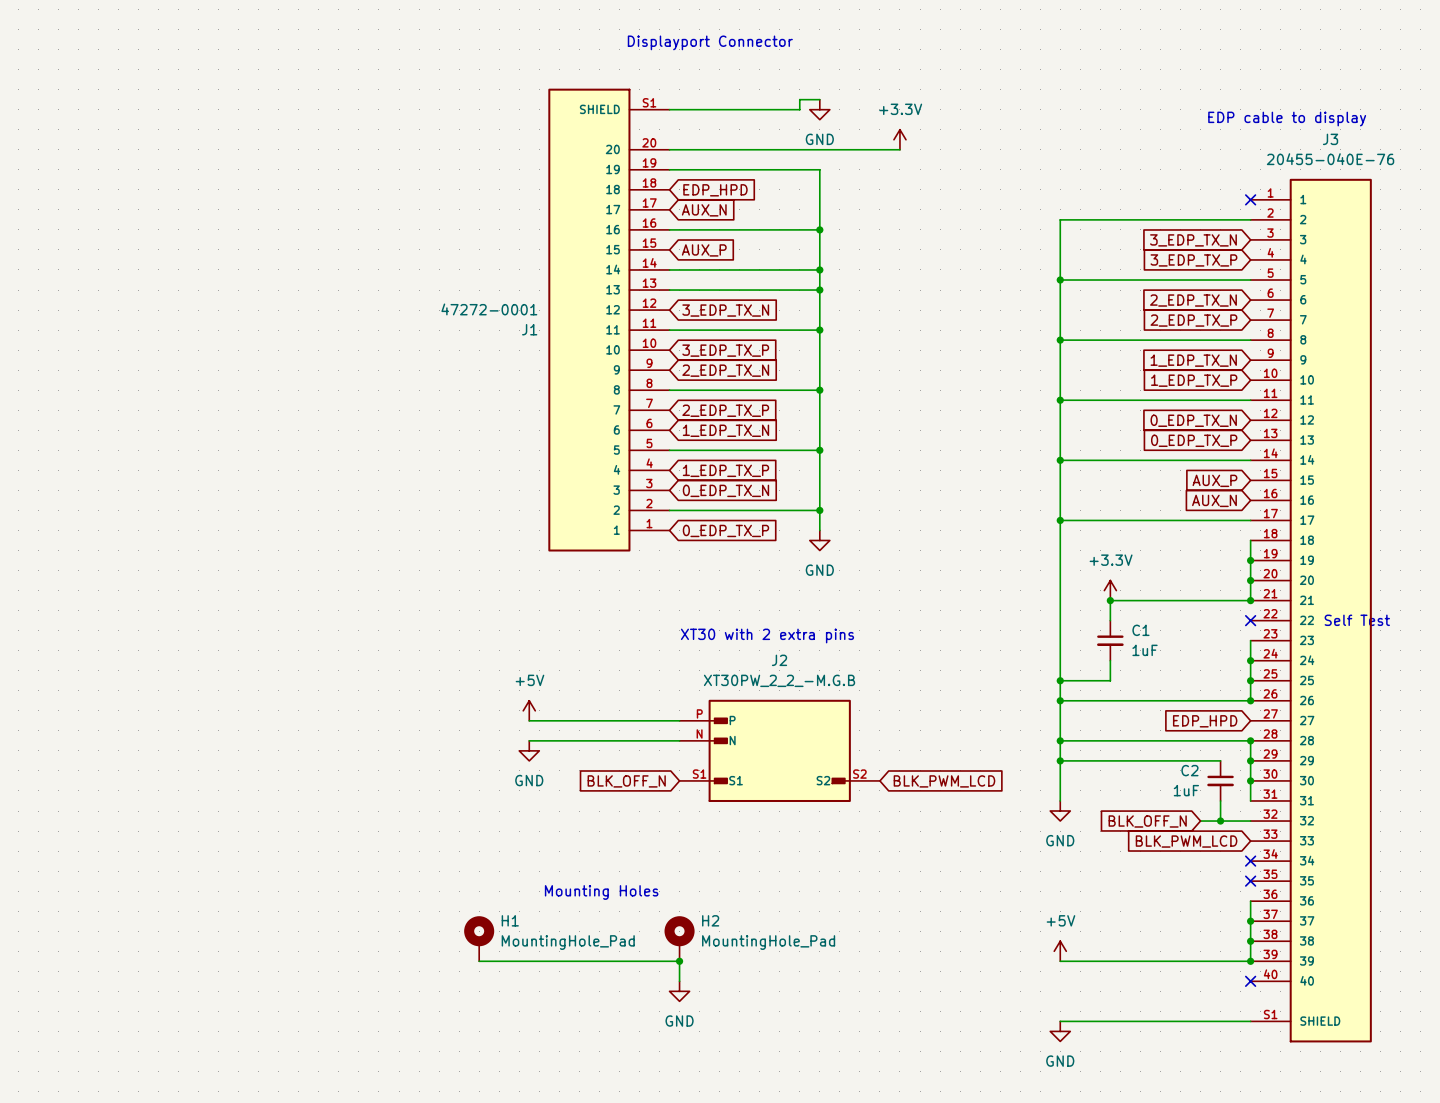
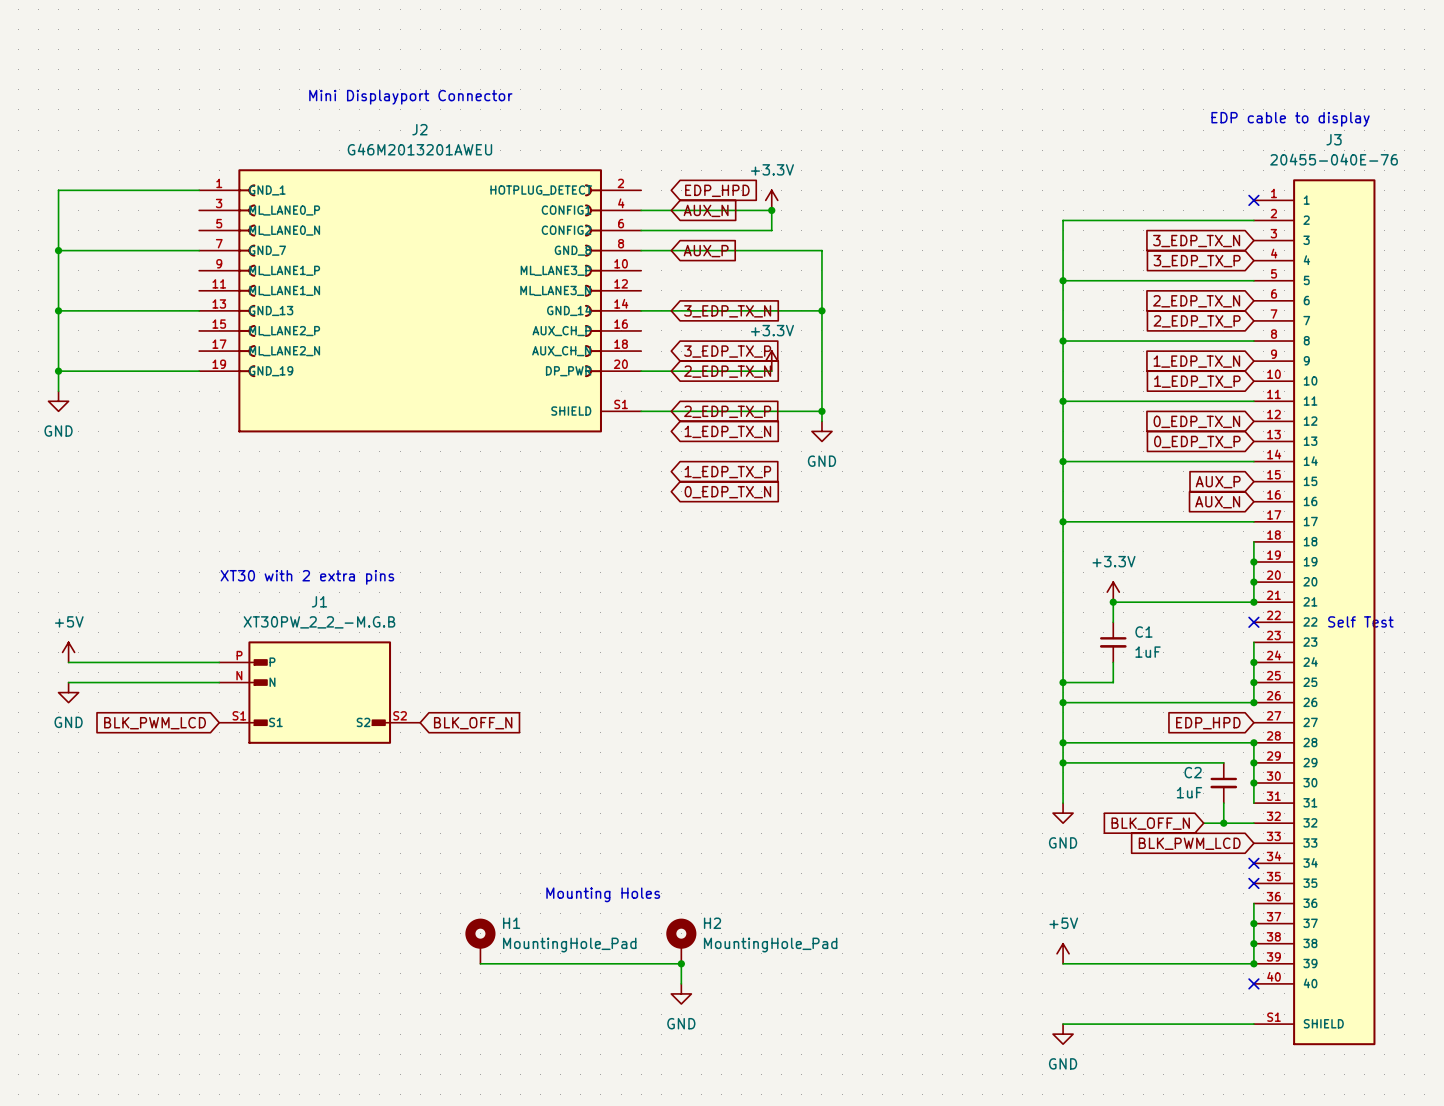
text: Displayport Connector (710, 42) -> none
J1 symbol: [548, 88, 670, 552] -> [219, 641, 421, 744]
text: none -> Mini Displayport Connector (410, 97)
wire: (819, 99) (799, 99) (799, 109) (669, 109) -> none
power symbol: GND (819, 109) -> none
power symbol: +3.3V (899, 139) -> none
wire: (669, 149) (899, 149) -> none
wire: (669, 169) (819, 169) (819, 249) -> (641, 250) (821, 250)
wire: none -> (199, 190) (58, 190) (58, 391)
power symbol: none -> +3.3V (771, 200)
junction: none -> (771, 210)
wire: (769, 229) (819, 229) -> (771, 230) (771, 210) (641, 210)
junction: (819, 229) -> none
wire: none -> (58, 250) (199, 250)
junction: none -> (58, 250)
wire: (669, 269) (819, 269) -> none
junction: (819, 269) -> none
wire: (669, 290) (819, 290) -> none
junction: (819, 290) -> none
J1 value: 47272-0001 (489, 309) -> XT30PW_2_2_-M.G.B (319, 622)
wire: none -> (58, 310) (199, 310)
junction: none -> (58, 310)
wire: none -> (641, 310) (821, 310)
junction: none -> (821, 310)
J1 name position: J1 (529, 329) -> J1 (319, 601)
wire: (669, 330) (819, 330) -> none
junction: (819, 330) -> none
power symbol: none -> +3.3V (771, 361)
wire: none -> (58, 371) (199, 371)
junction: none -> (58, 371)
wire: none -> (641, 371) (771, 371)
wire: (669, 390) (819, 390) -> none
junction: (819, 390) -> none
power symbol: none -> GND (58, 401)
wire: none -> (641, 411) (821, 411)
junction: none -> (821, 411)
wire: (819, 420) (819, 530) -> none
wire: (669, 450) (819, 450) -> none
junction: (819, 450) -> none
wire: (669, 510) (819, 510) -> none
junction: (819, 510) -> none
global label: 0_EDP_TX_P (725, 530) -> none
power symbol position: GND (819, 540) -> GND (821, 431)
text: none -> XT30 with 2 extra pins (307, 577)
text: XT30 with 2 extra pins (767, 636) -> none
power symbol: none -> +5V (68, 652)
wire: none -> (68, 662) (219, 662)
J2 name position: J2 (779, 660) -> J2 (419, 129)
wire: none -> (68, 682) (219, 682)
J2 value: XT30PW_2_2_-M.G.B (779, 680) -> G46M2013201AWEU (419, 149)
power symbol: none -> GND (68, 692)
J2 symbol: [679, 699, 880, 802] -> [199, 169, 642, 433]
power symbol: +5V (529, 710) -> none
wire: (529, 720) (679, 720) -> none
global label: none -> BLK_PWM_LCD (155, 723)
global label: none -> BLK_OFF_N (473, 723)
wire: (529, 740) (679, 740) -> none
power symbol: GND (529, 750) -> none
global label: BLK_OFF_N (626, 781) -> none
global label: BLK_PWM_LCD (944, 781) -> none

